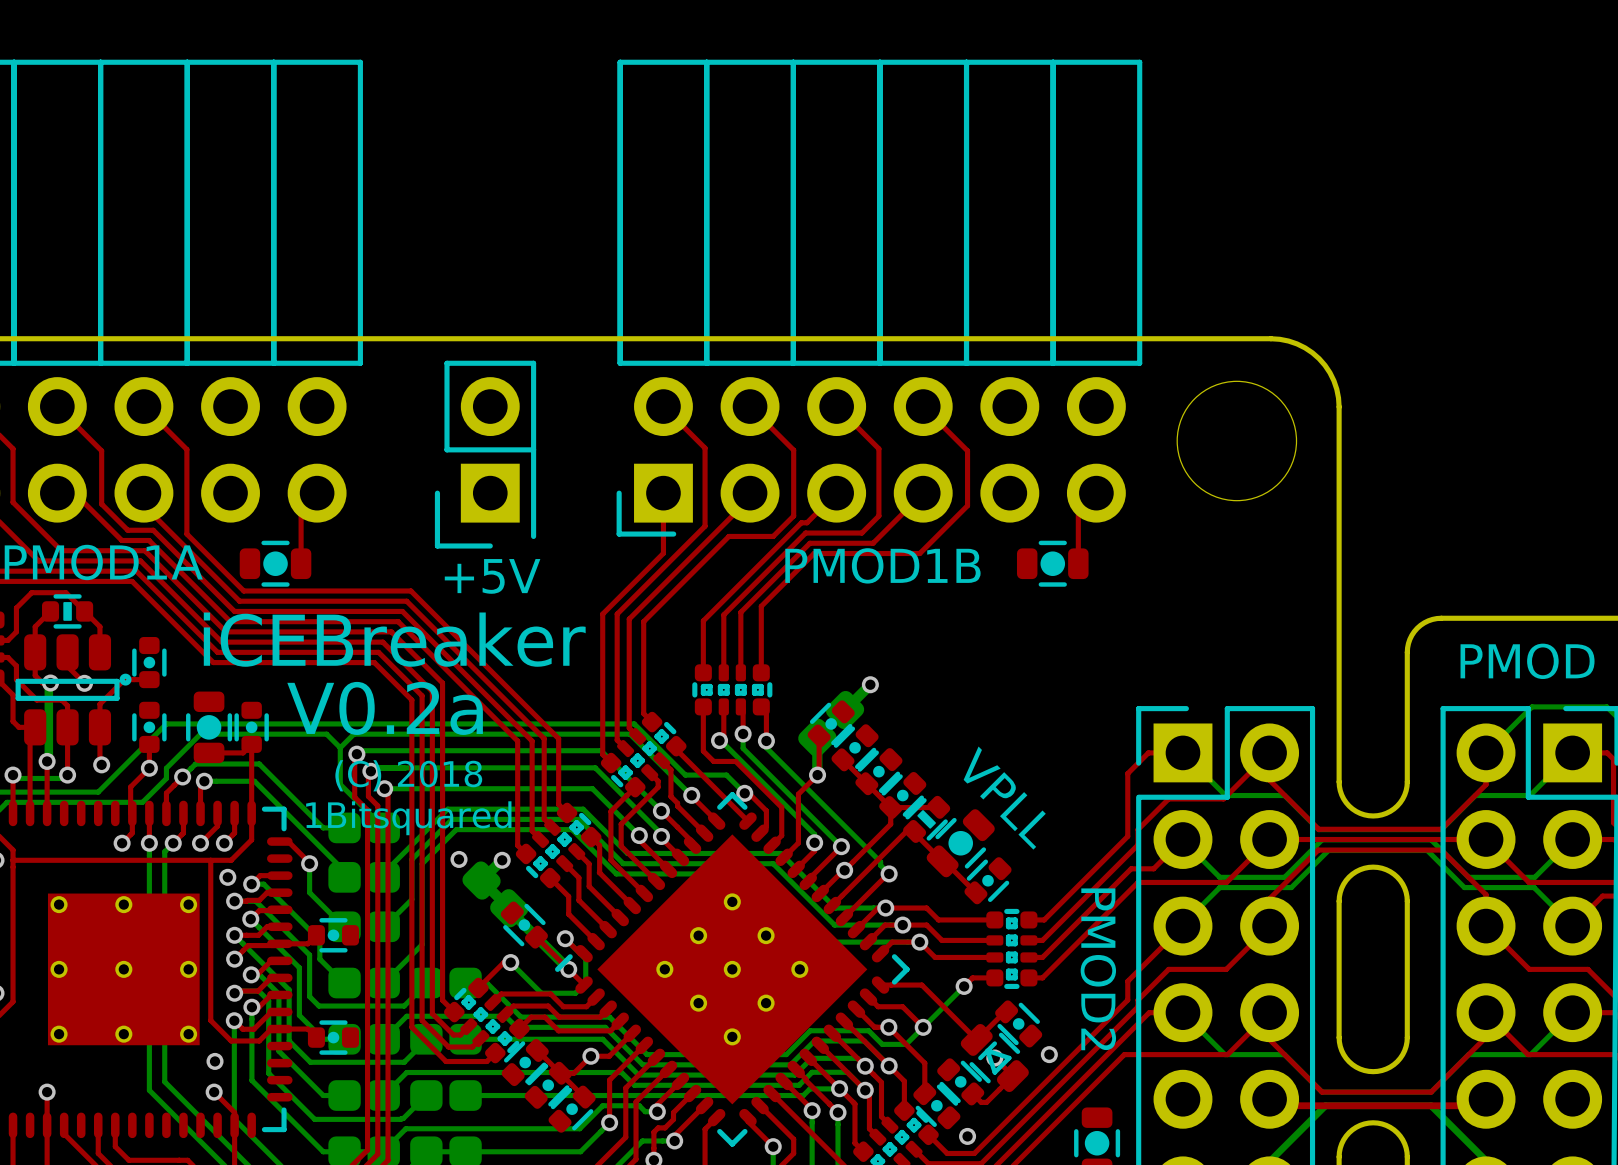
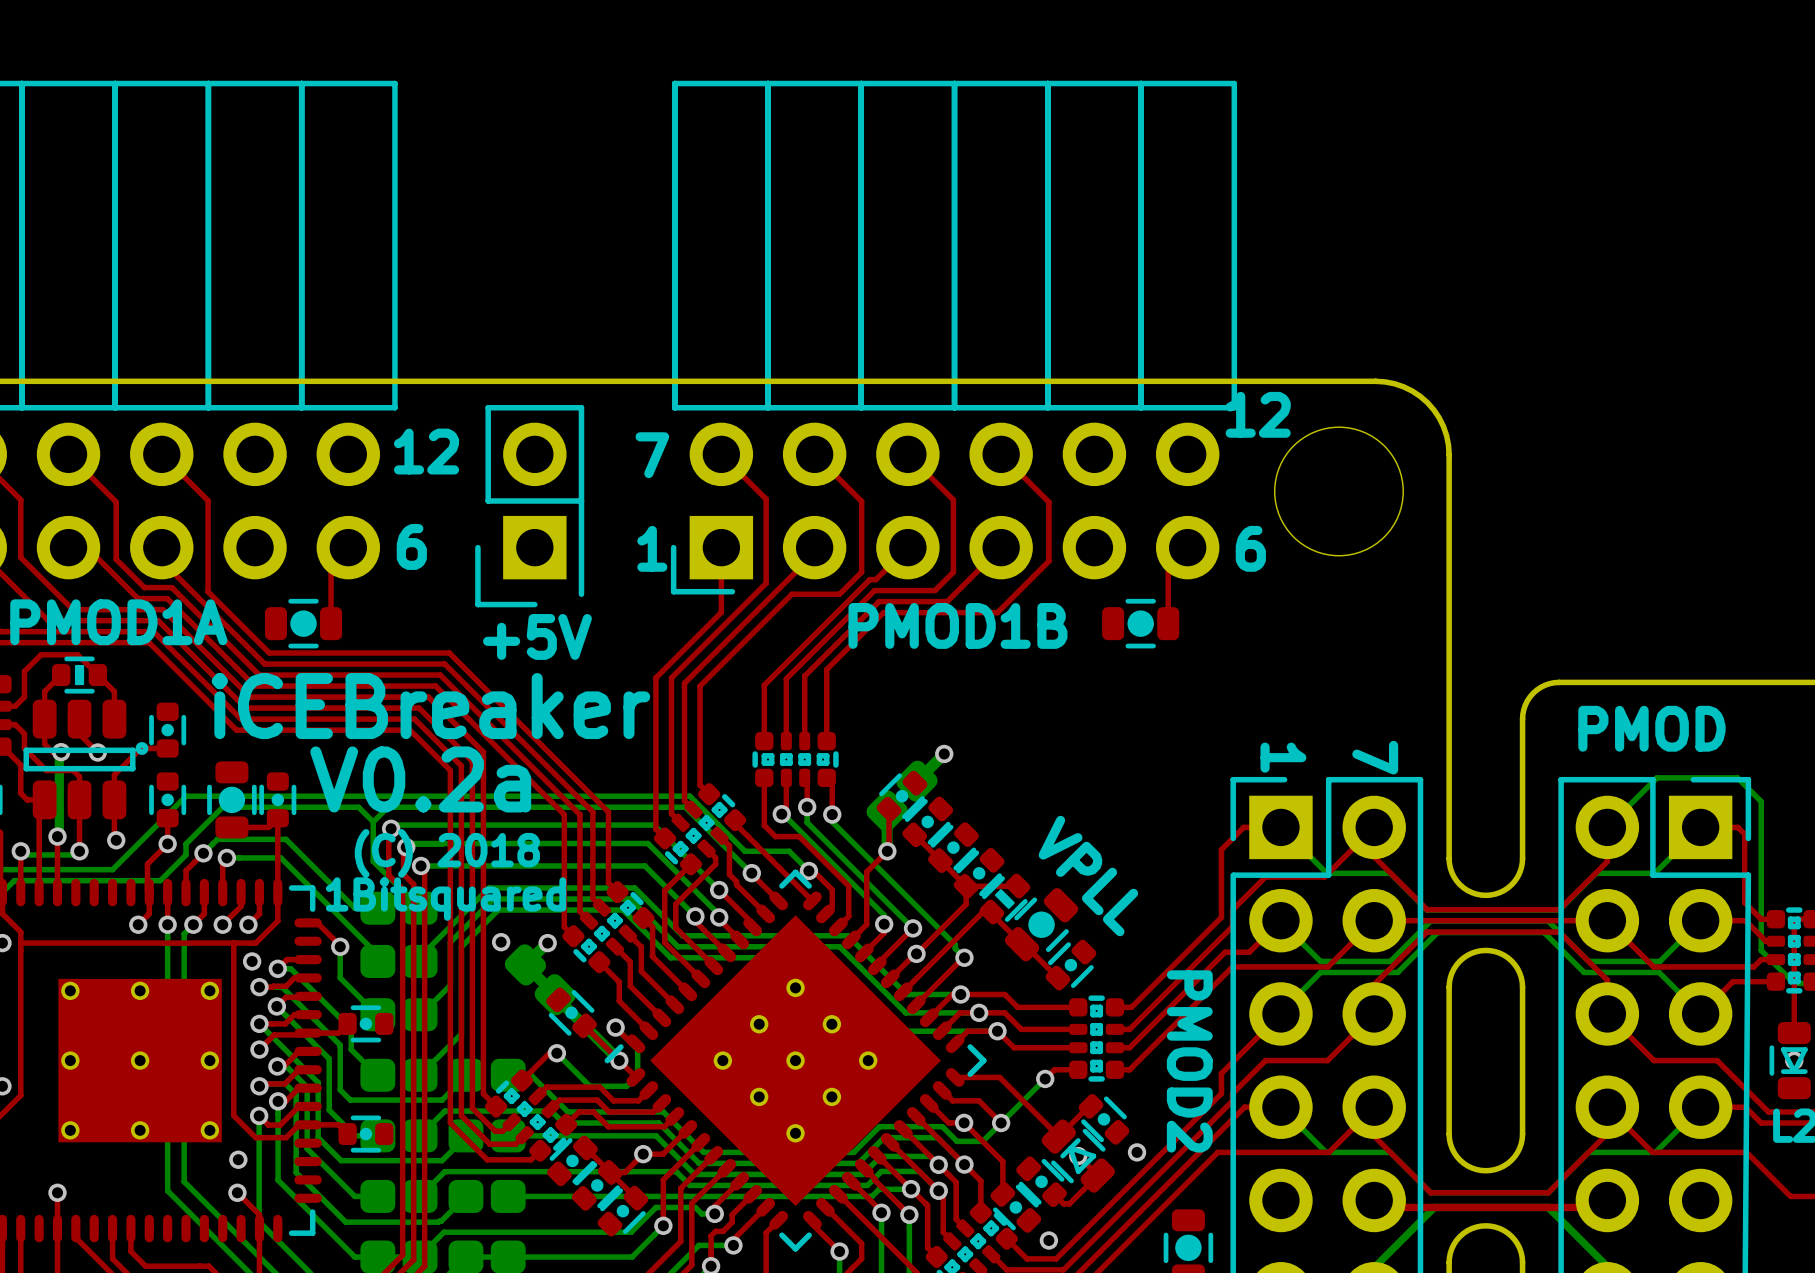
text: none -> 12 (1258, 414)
text: none -> 12 (426, 451)
text: none -> 7 (652, 455)
text: none -> 6 (411, 547)
text: none -> 1 (652, 548)
text: none -> 6 (1250, 548)
text: none -> 1 (1283, 757)
text: none -> 7 (1375, 757)

